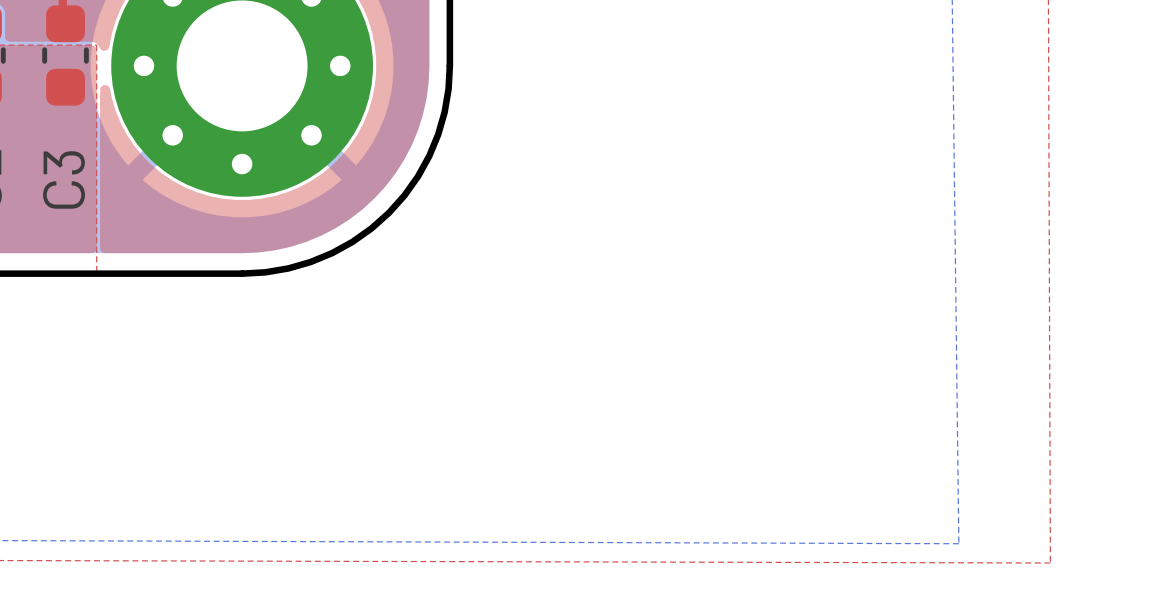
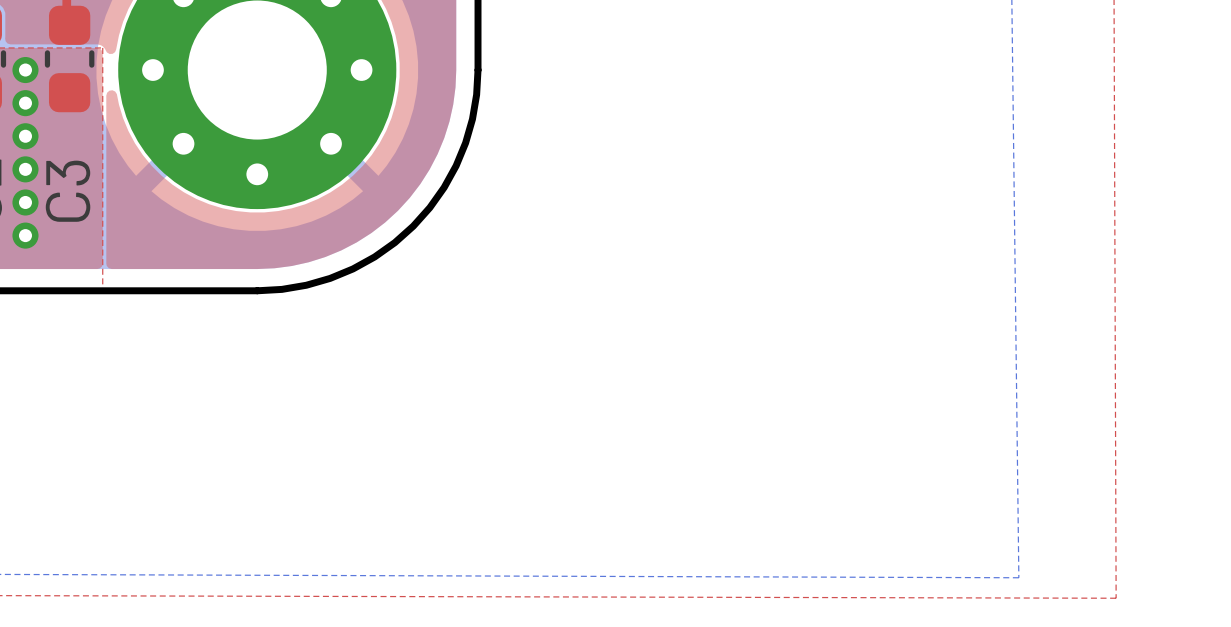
via: none -> (25, 70)
via: none -> (25, 103)
via: none -> (25, 136)
via: none -> (25, 169)
via: none -> (25, 202)
via: none -> (25, 235)

